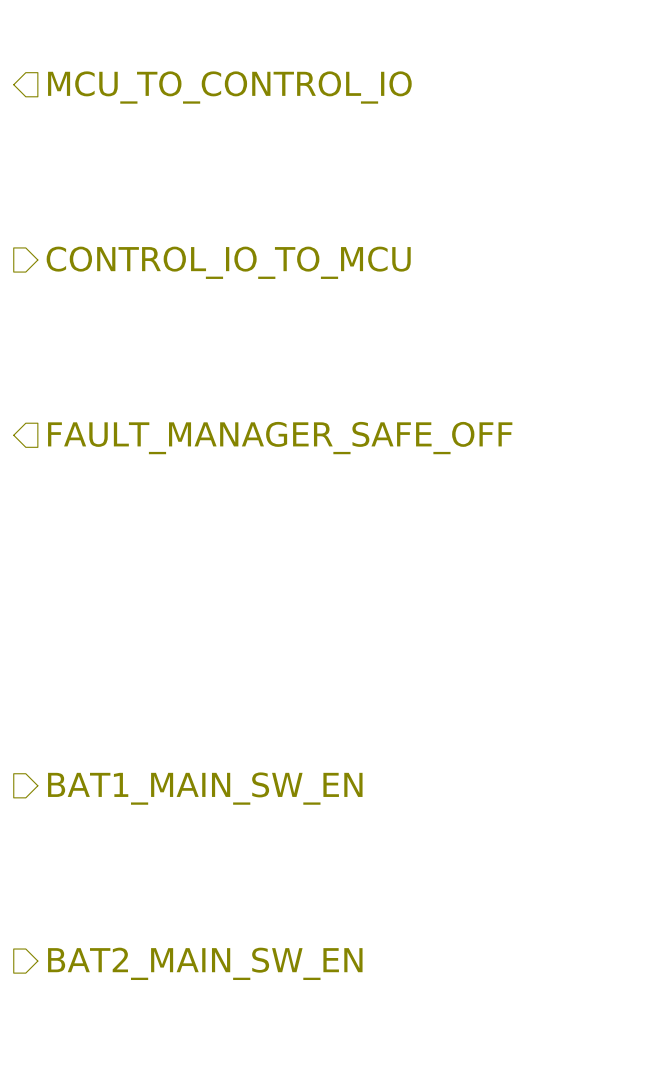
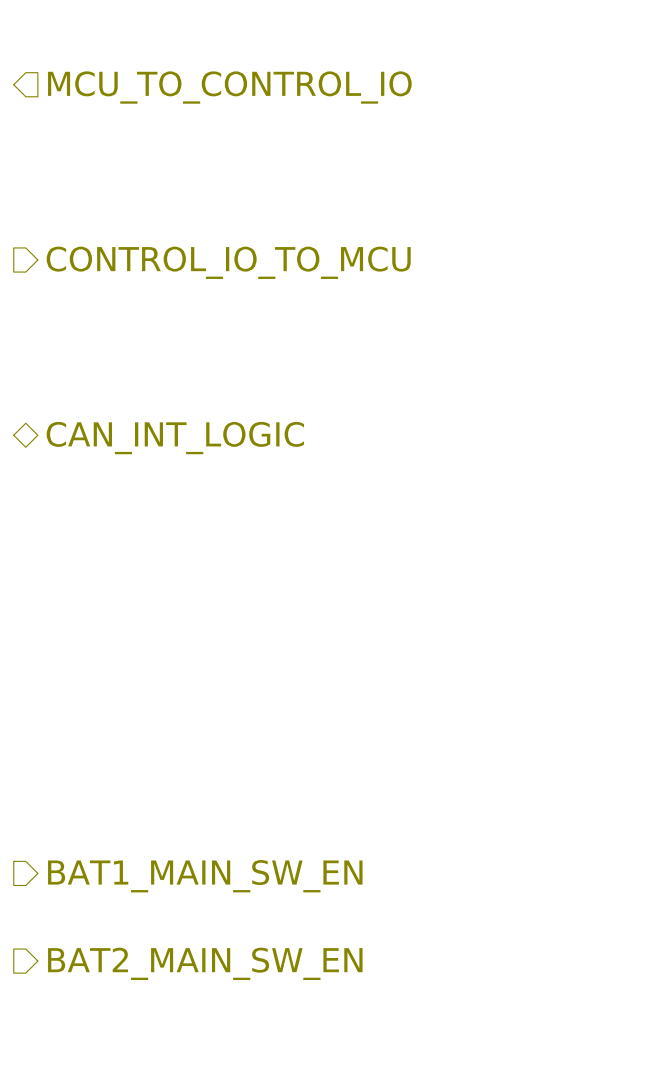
hierarchical label shape: input (280, 438) -> bidirectional (175, 438)
hierarchical label: FAULT_MANAGER_SAFE_OFF (280, 438) -> CAN_INT_LOGIC (175, 438)
hierarchical label position: BAT1_MAIN_SW_EN (205, 788) -> BAT1_MAIN_SW_EN (205, 876)

